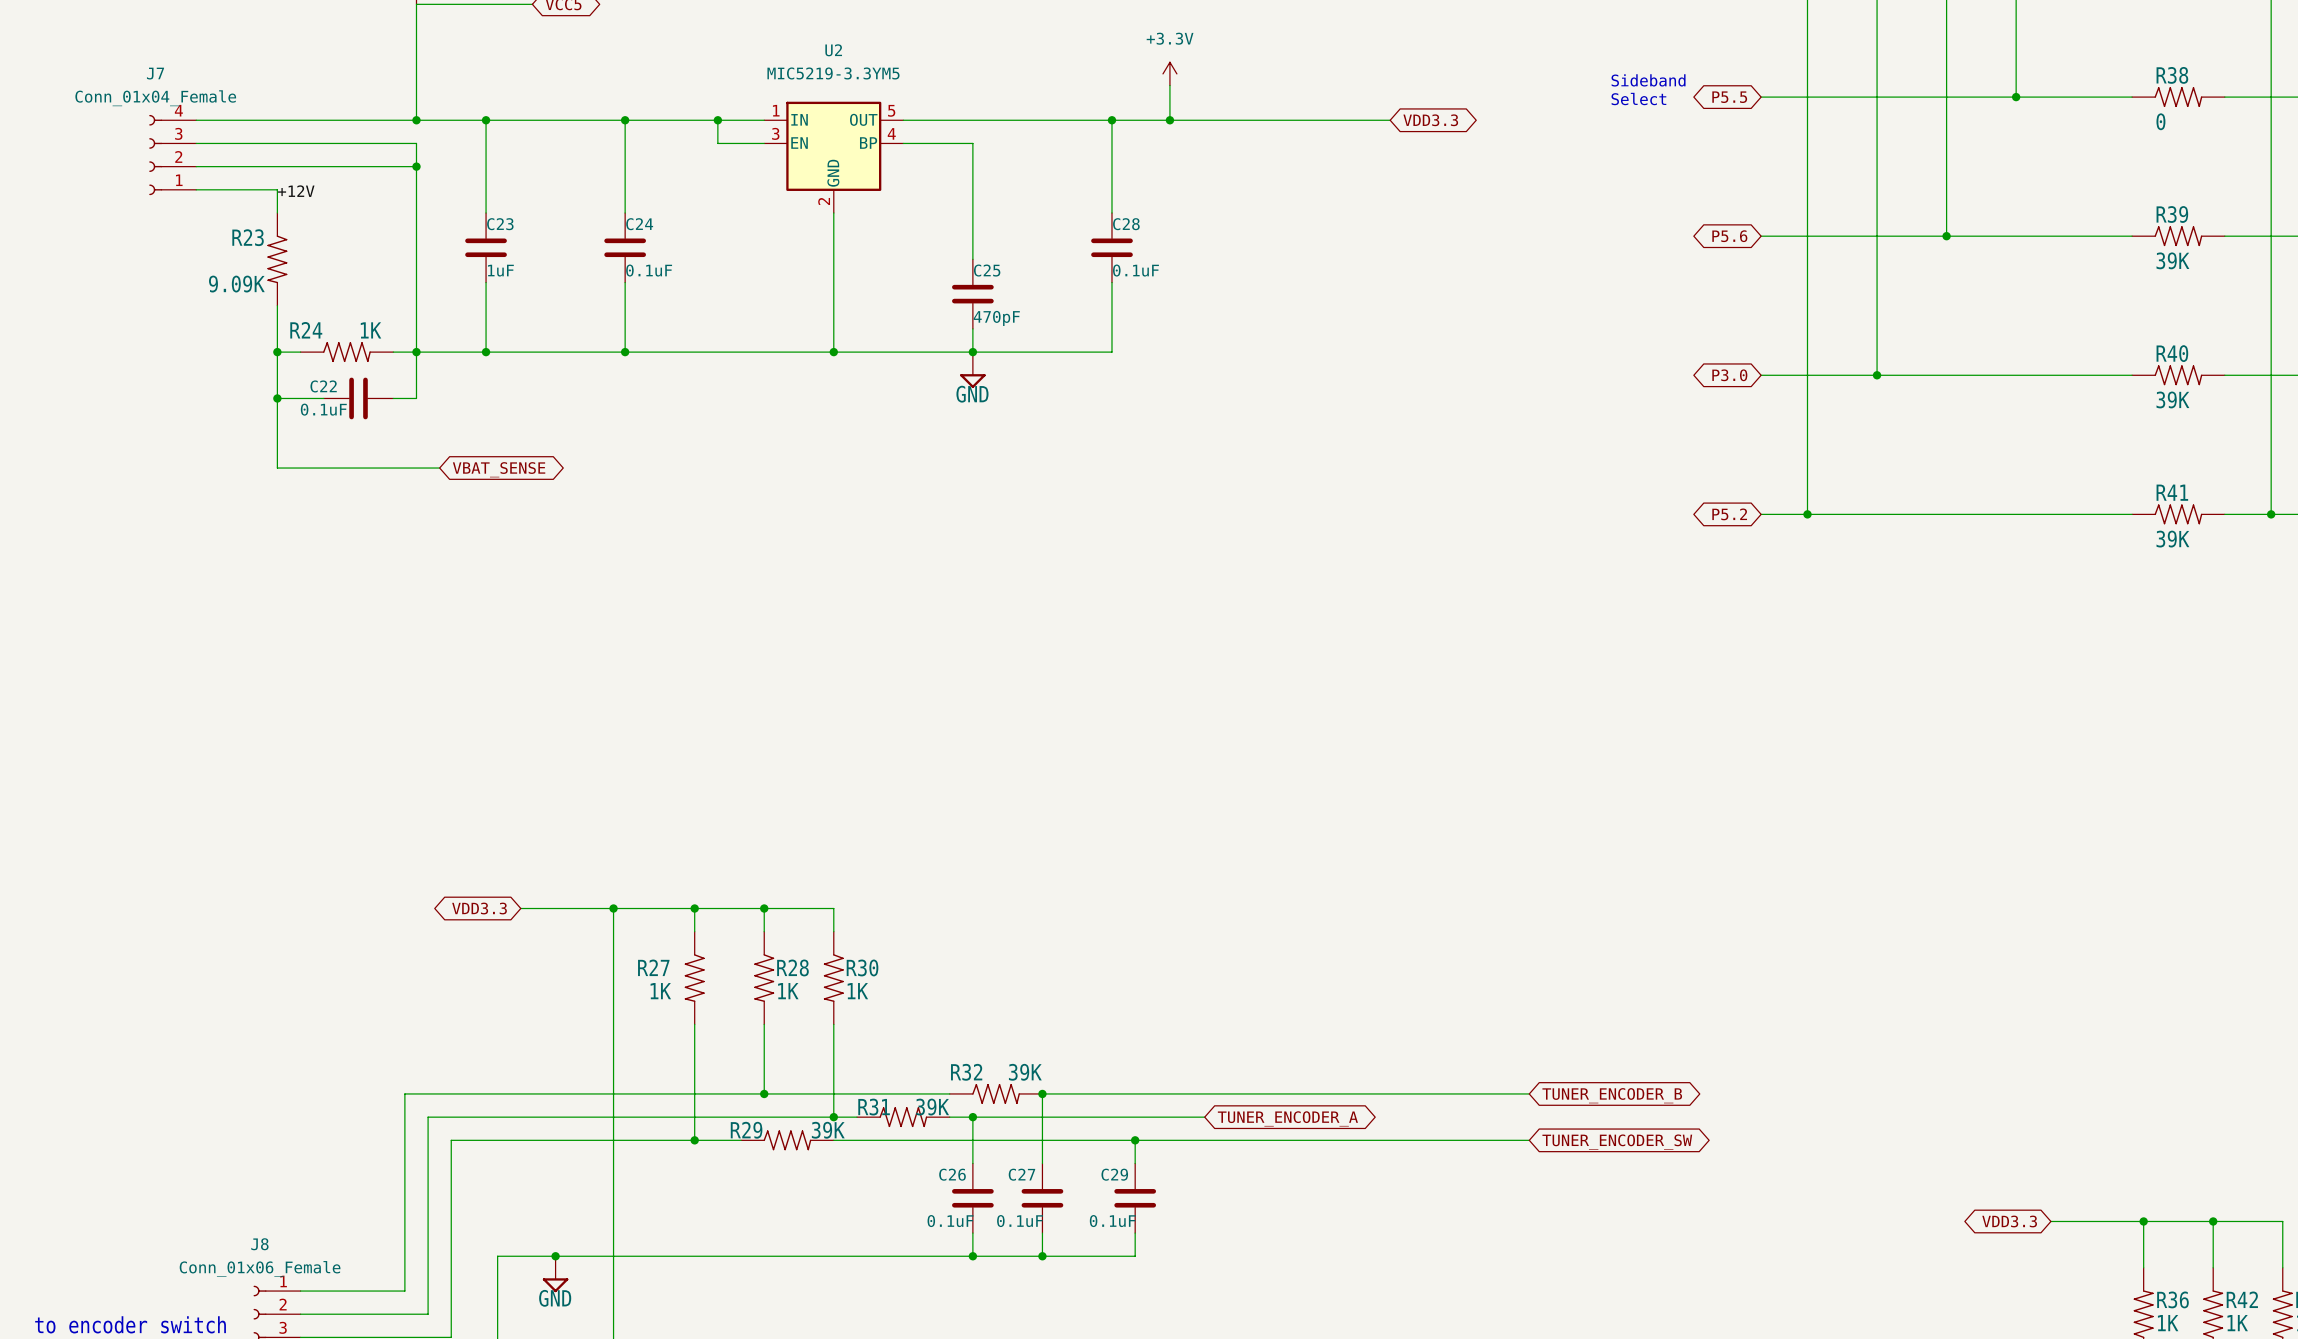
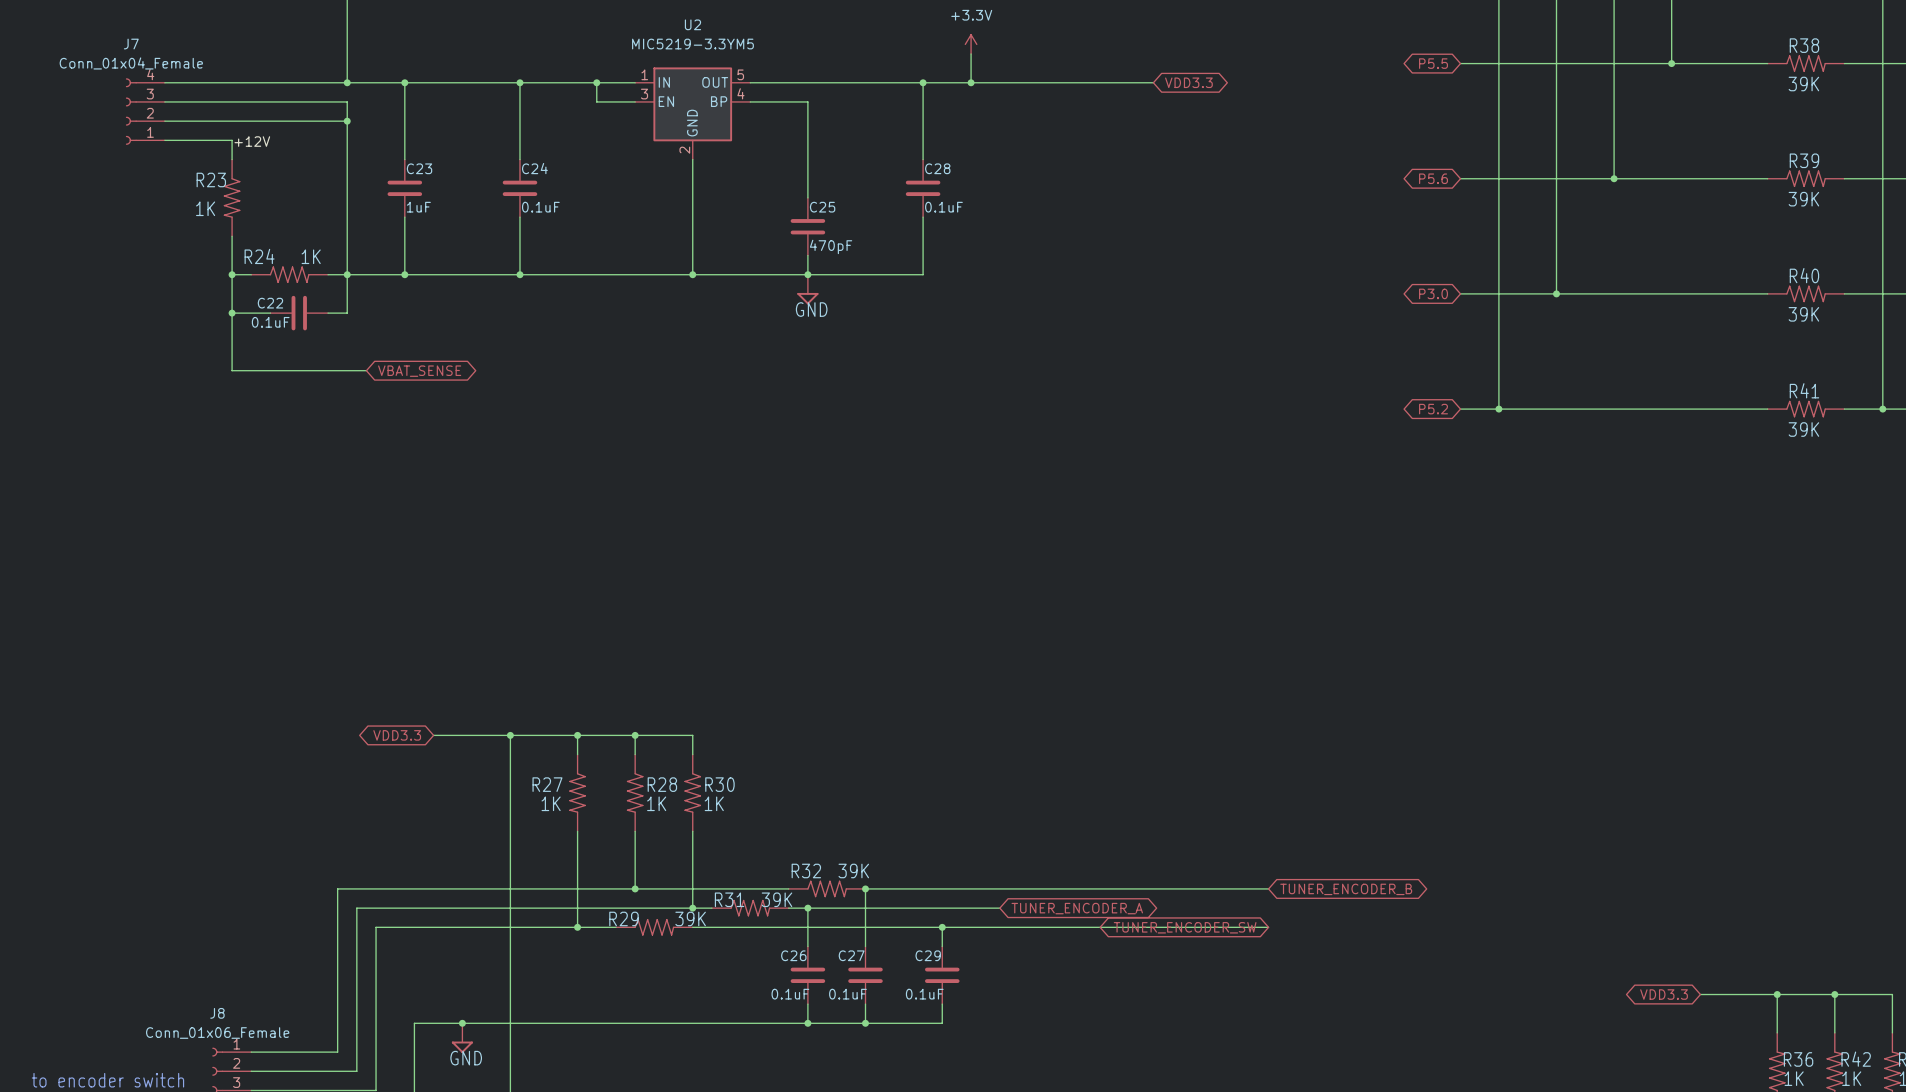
text: Sideband (1648, 80) -> none
text: Select (1638, 99) -> none
R38 value: 0 (2160, 121) -> 39K (1803, 84)
R23 value: 9.09K (236, 284) -> 1K (205, 208)
global label rotation: 0° (1617, 1142) -> 180° (1185, 927)

